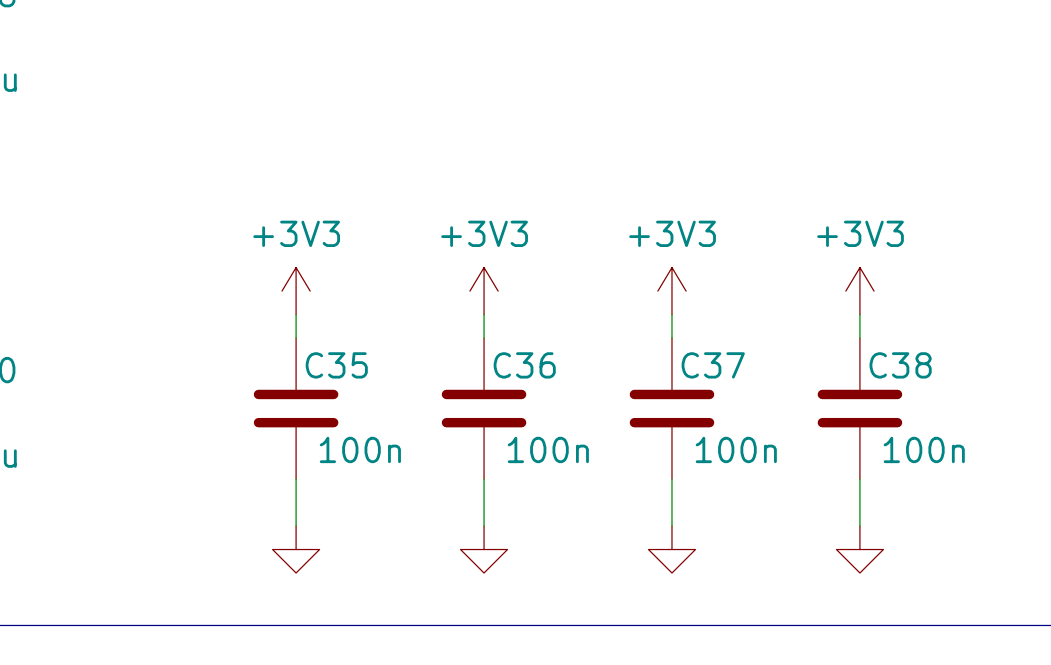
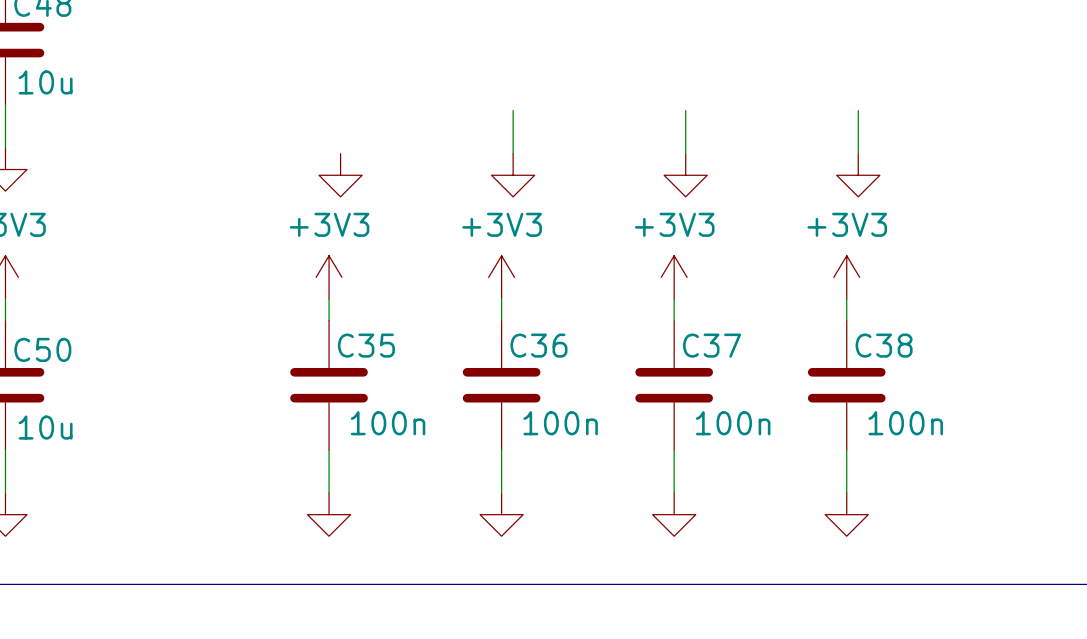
wire: none -> (513, 110) (513, 153)
wire: none -> (685, 110) (685, 153)
wire: none -> (858, 110) (858, 153)
power symbol: none -> (340, 175)
power symbol: none -> (513, 175)
power symbol: none -> (685, 175)
power symbol: none -> (858, 175)

